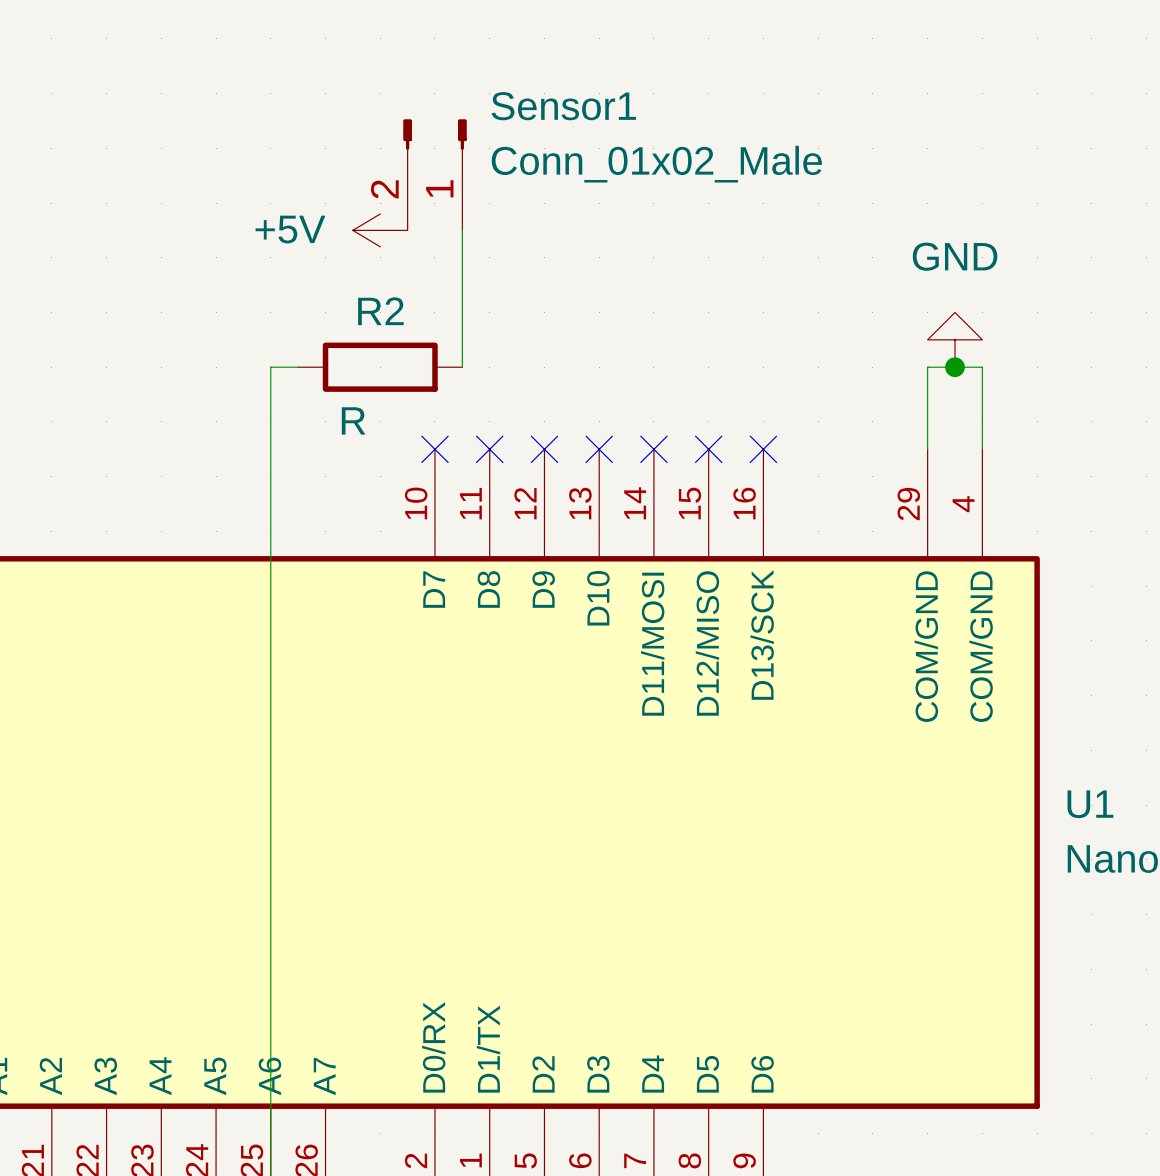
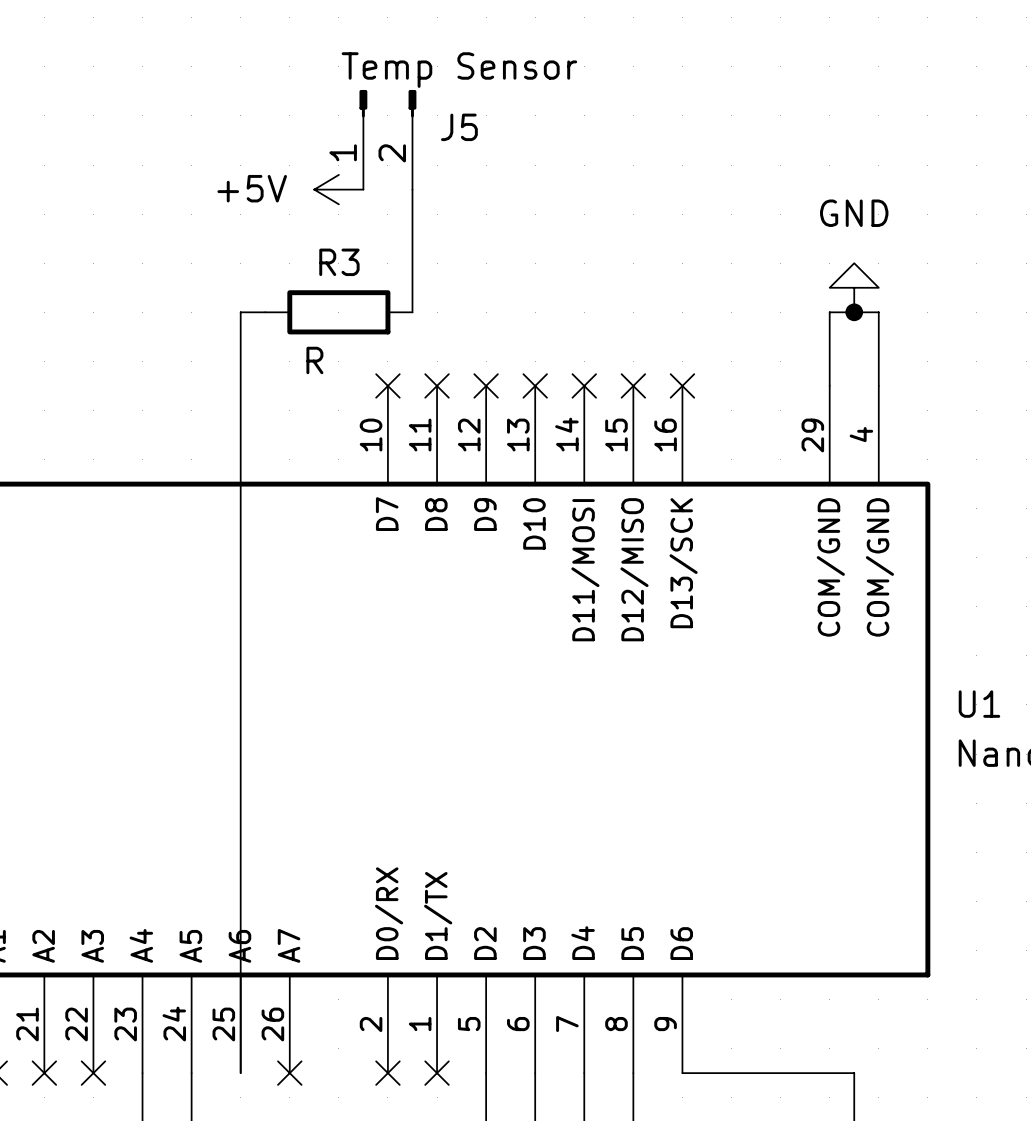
Sensor1 name: Sensor1 (563, 106) -> J5 (459, 127)
Sensor1 flip: as is (434, 134) -> left-right (387, 103)
Sensor1 value: Conn_01x02_Male (656, 164) -> Temp Sensor (459, 70)
R2 name: R2 (380, 311) -> R3 (339, 262)

